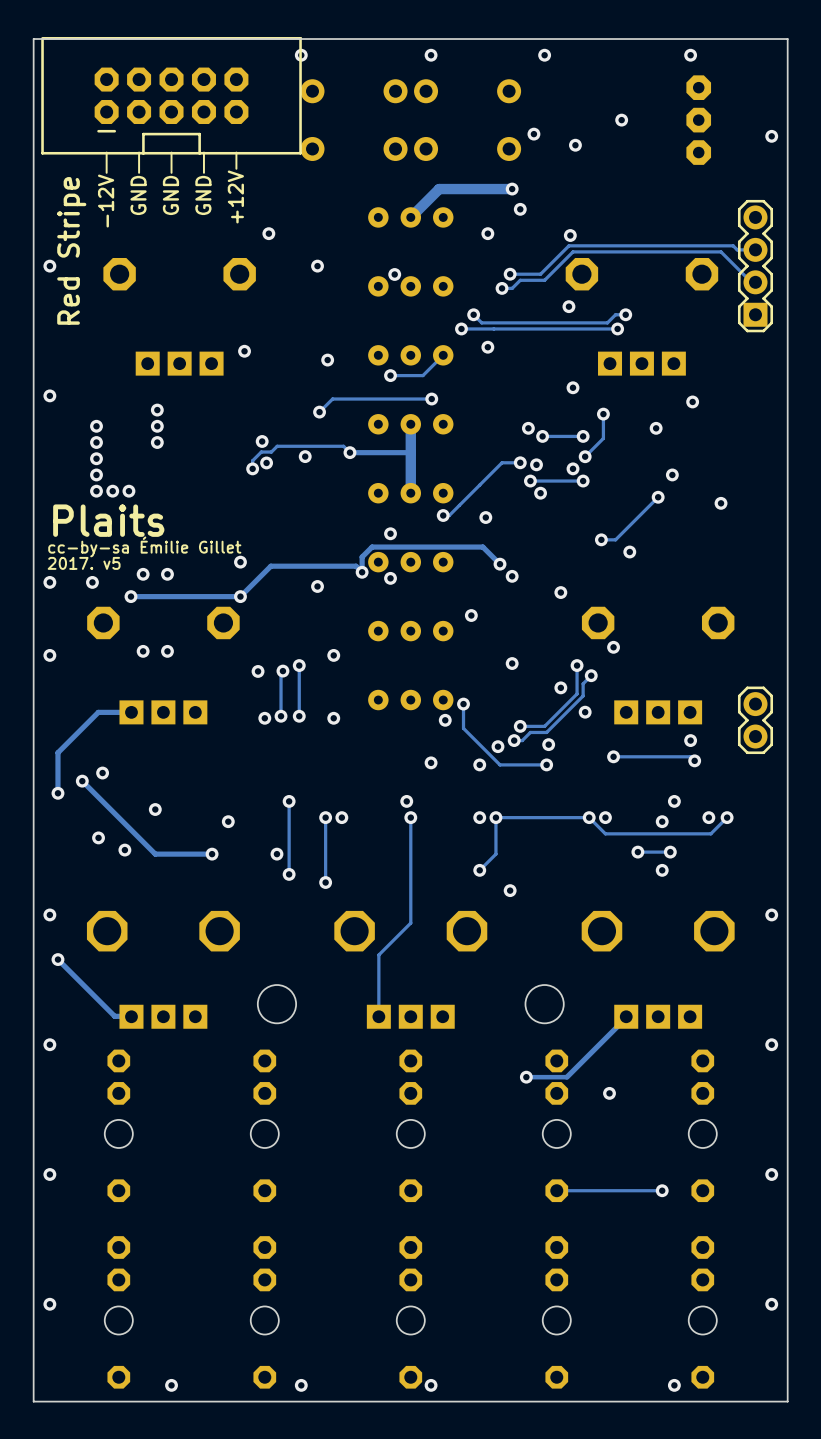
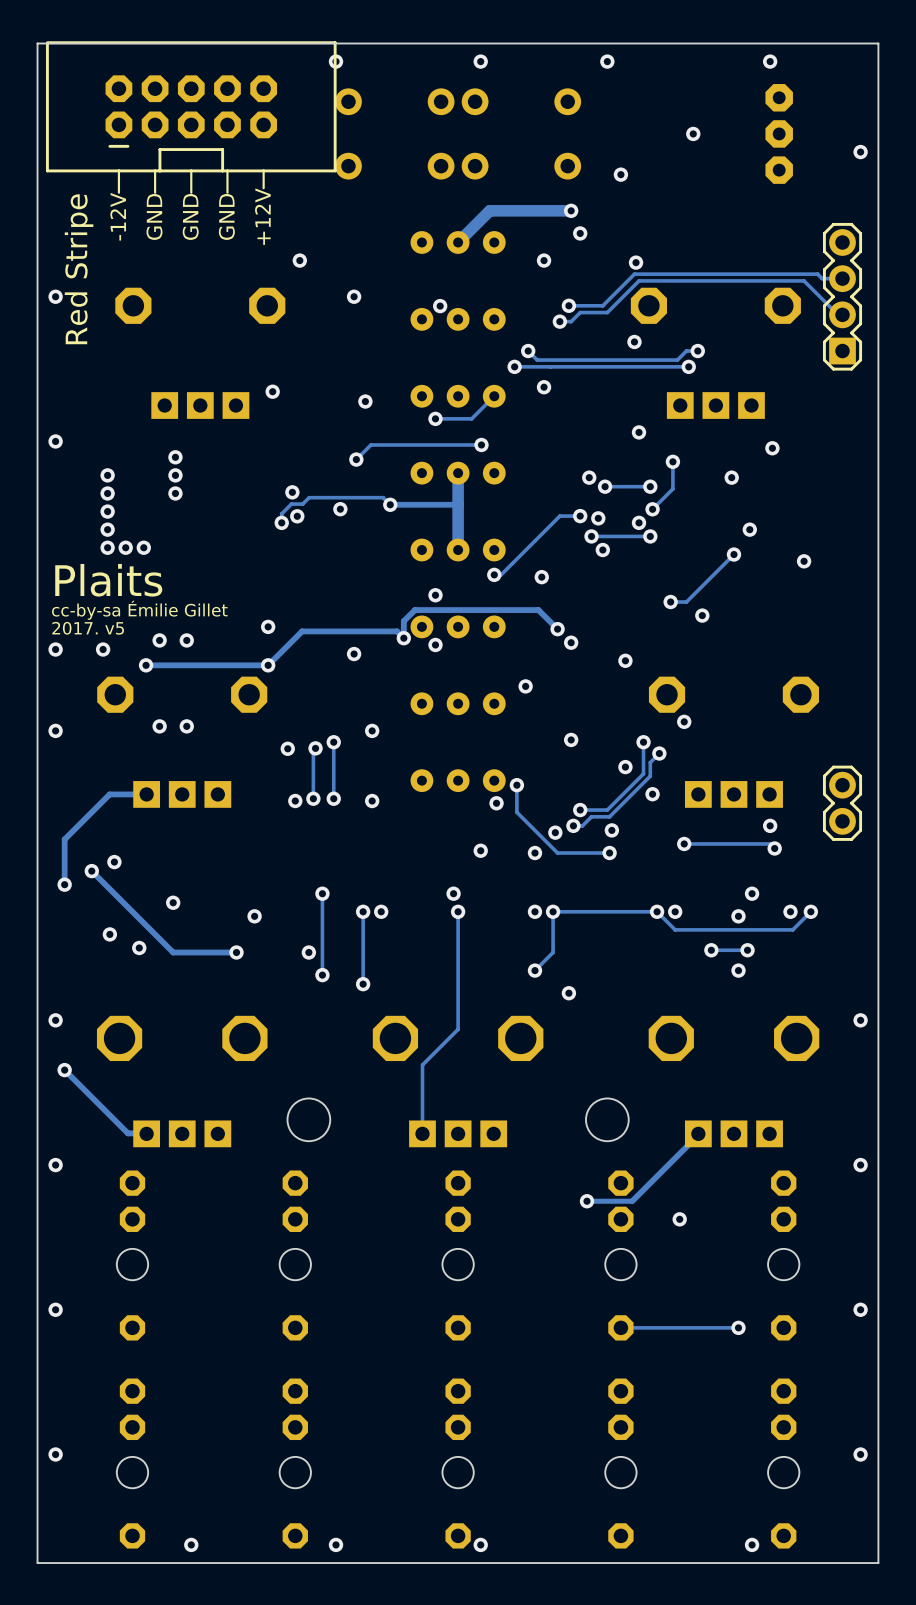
via: (533, 134) -> none
via: (575, 145) -> none
via: none -> (620, 174)

